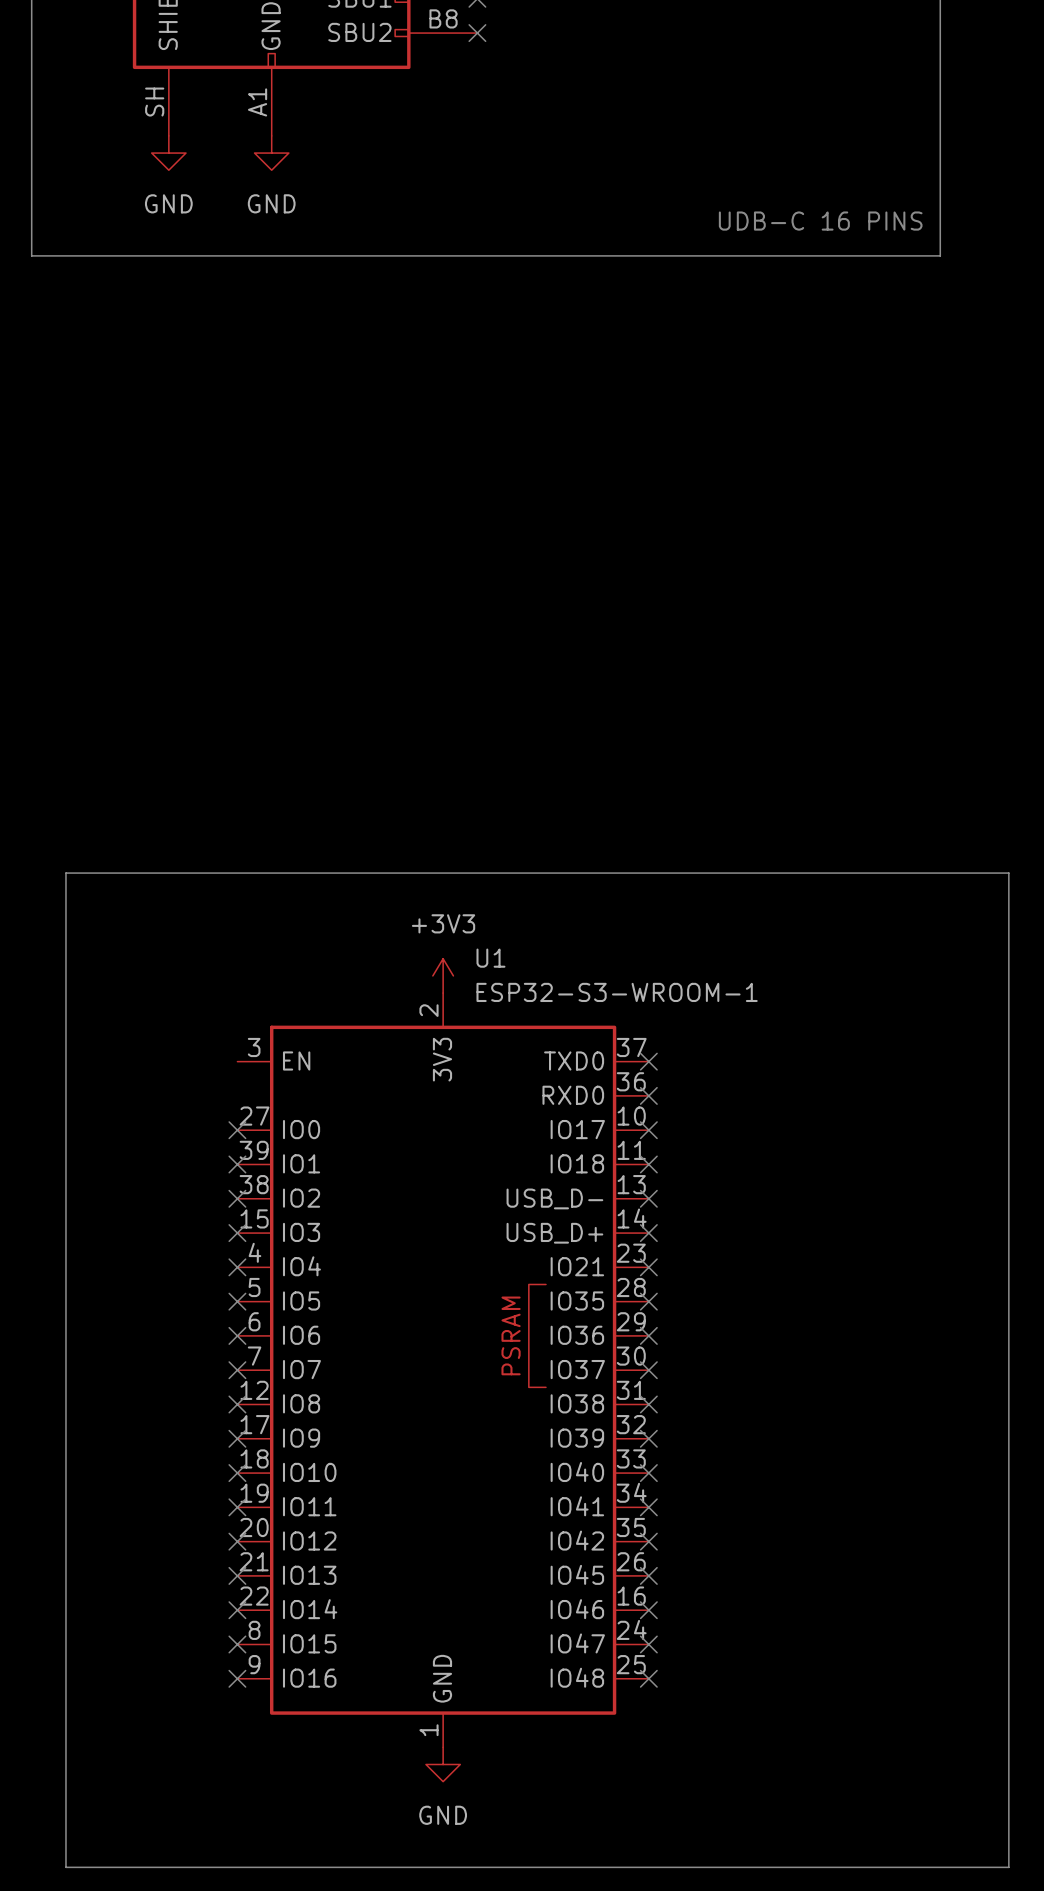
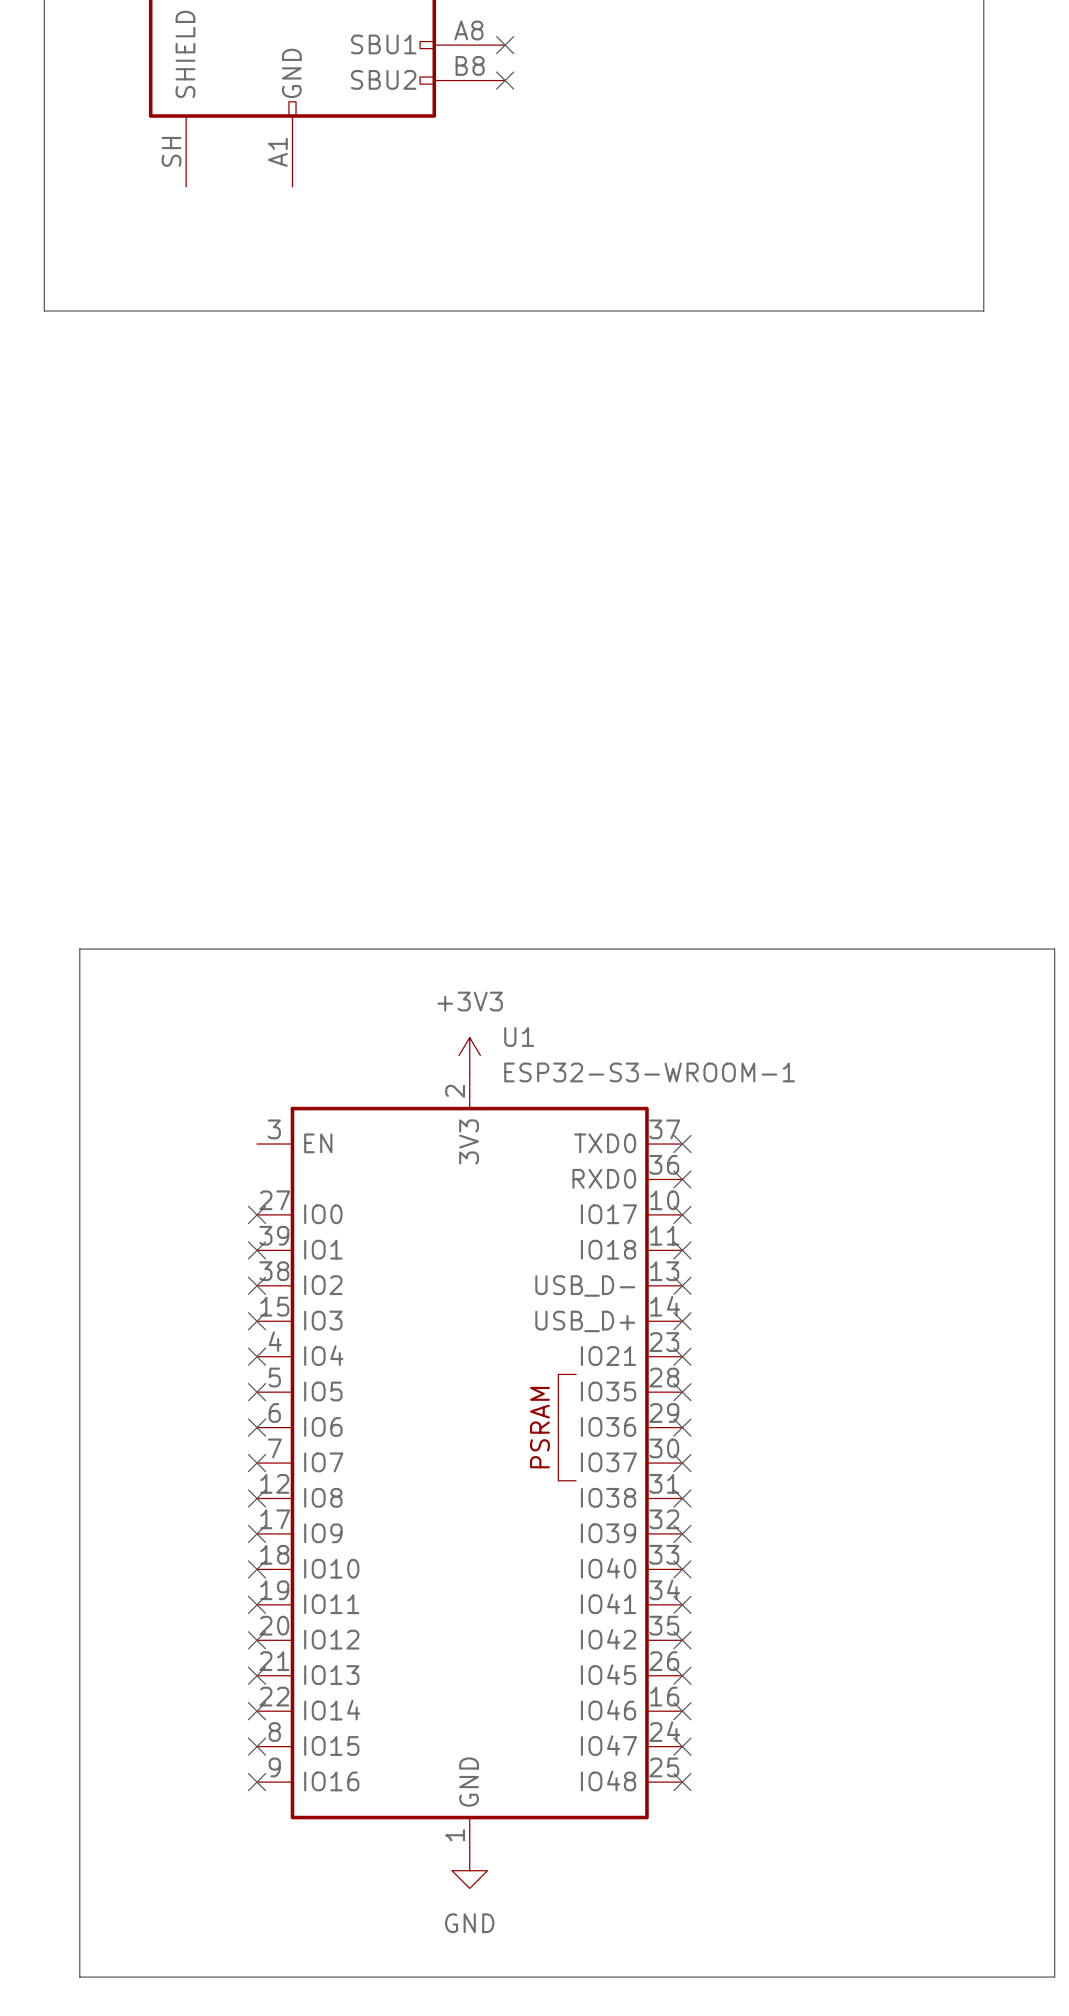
power symbol: GND (168, 153) -> none
power symbol: GND (271, 153) -> none
text: UDB-C 16 PINS (820, 221) -> none

